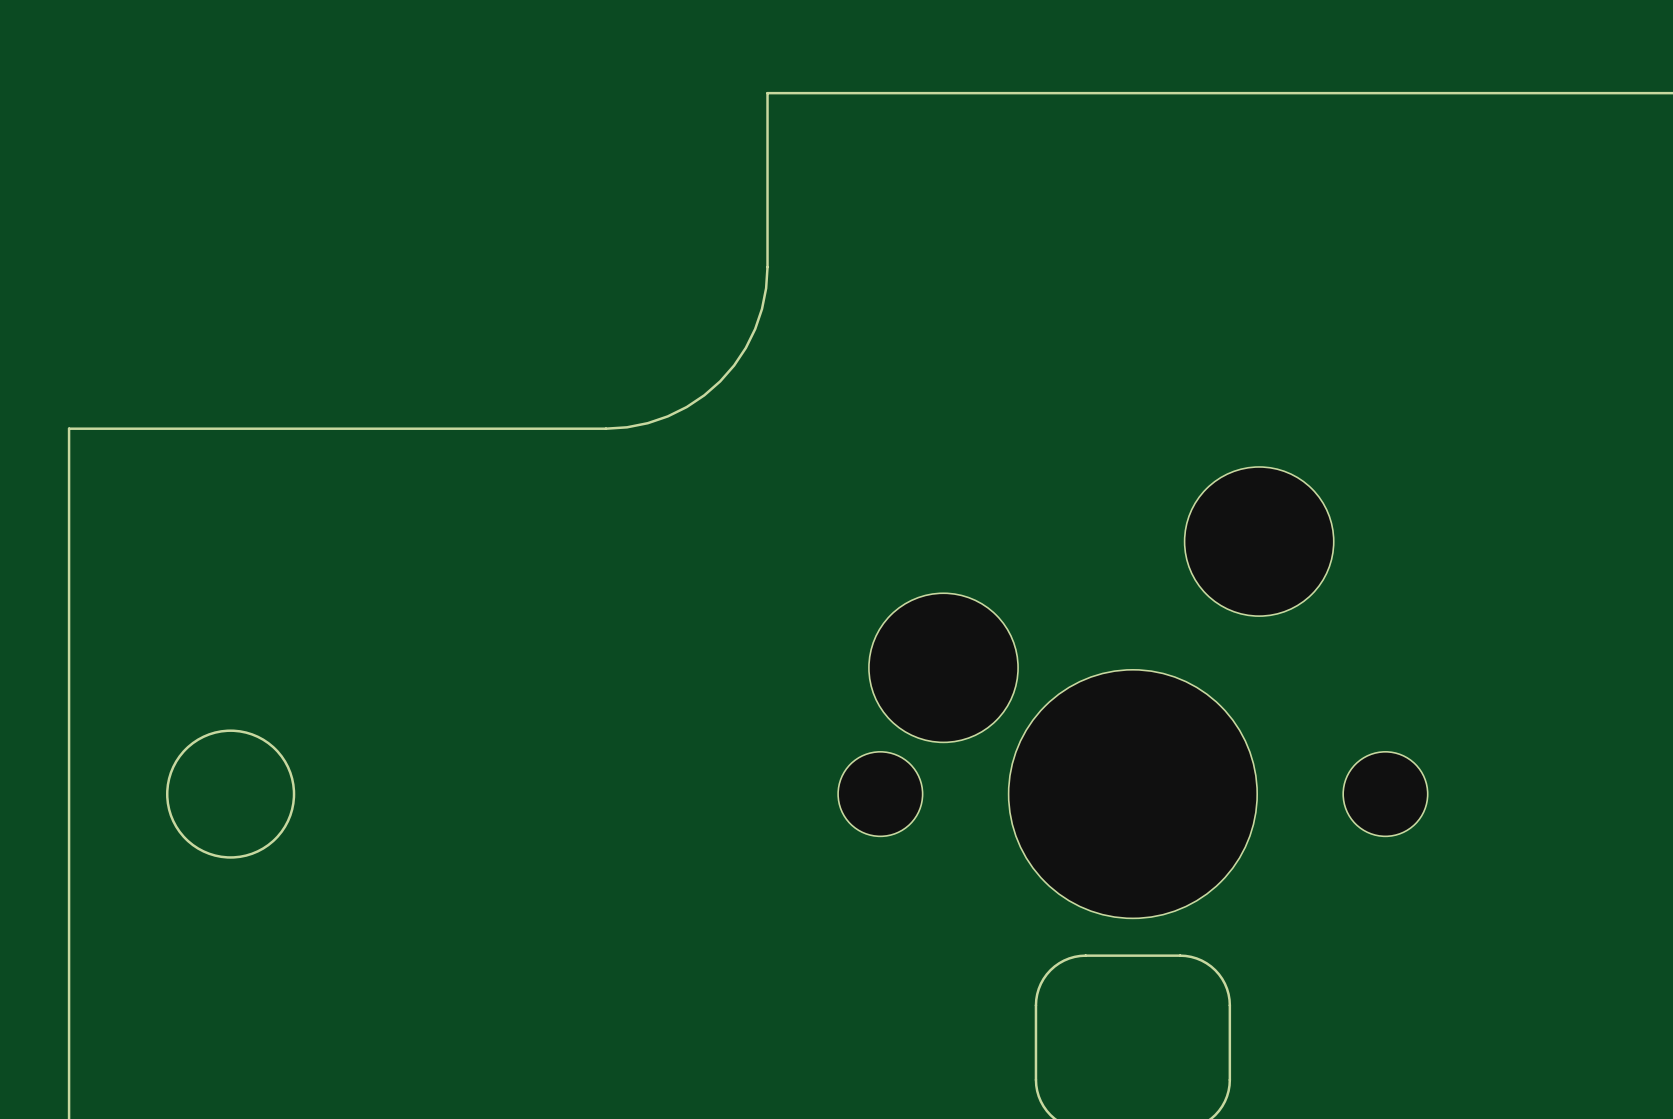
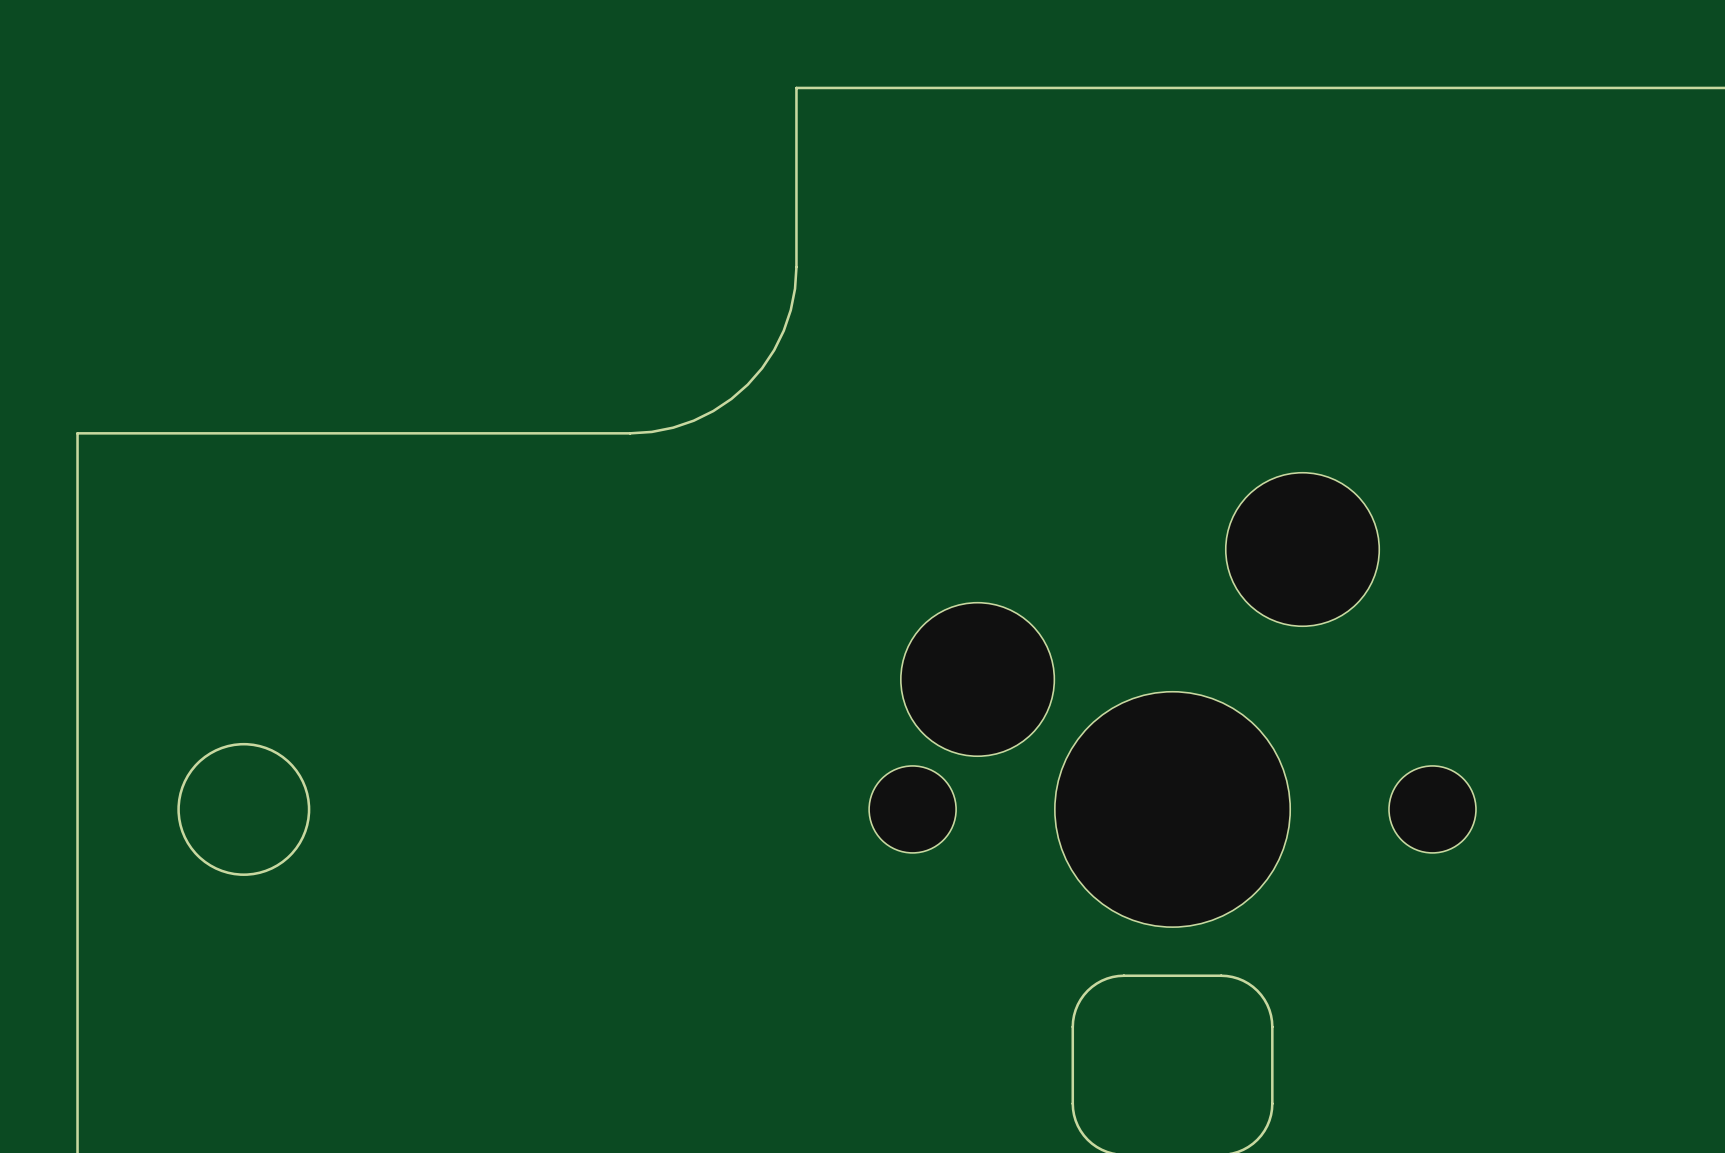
part footprint: [838, 466, 1428, 919] -> [869, 472, 1476, 928]

